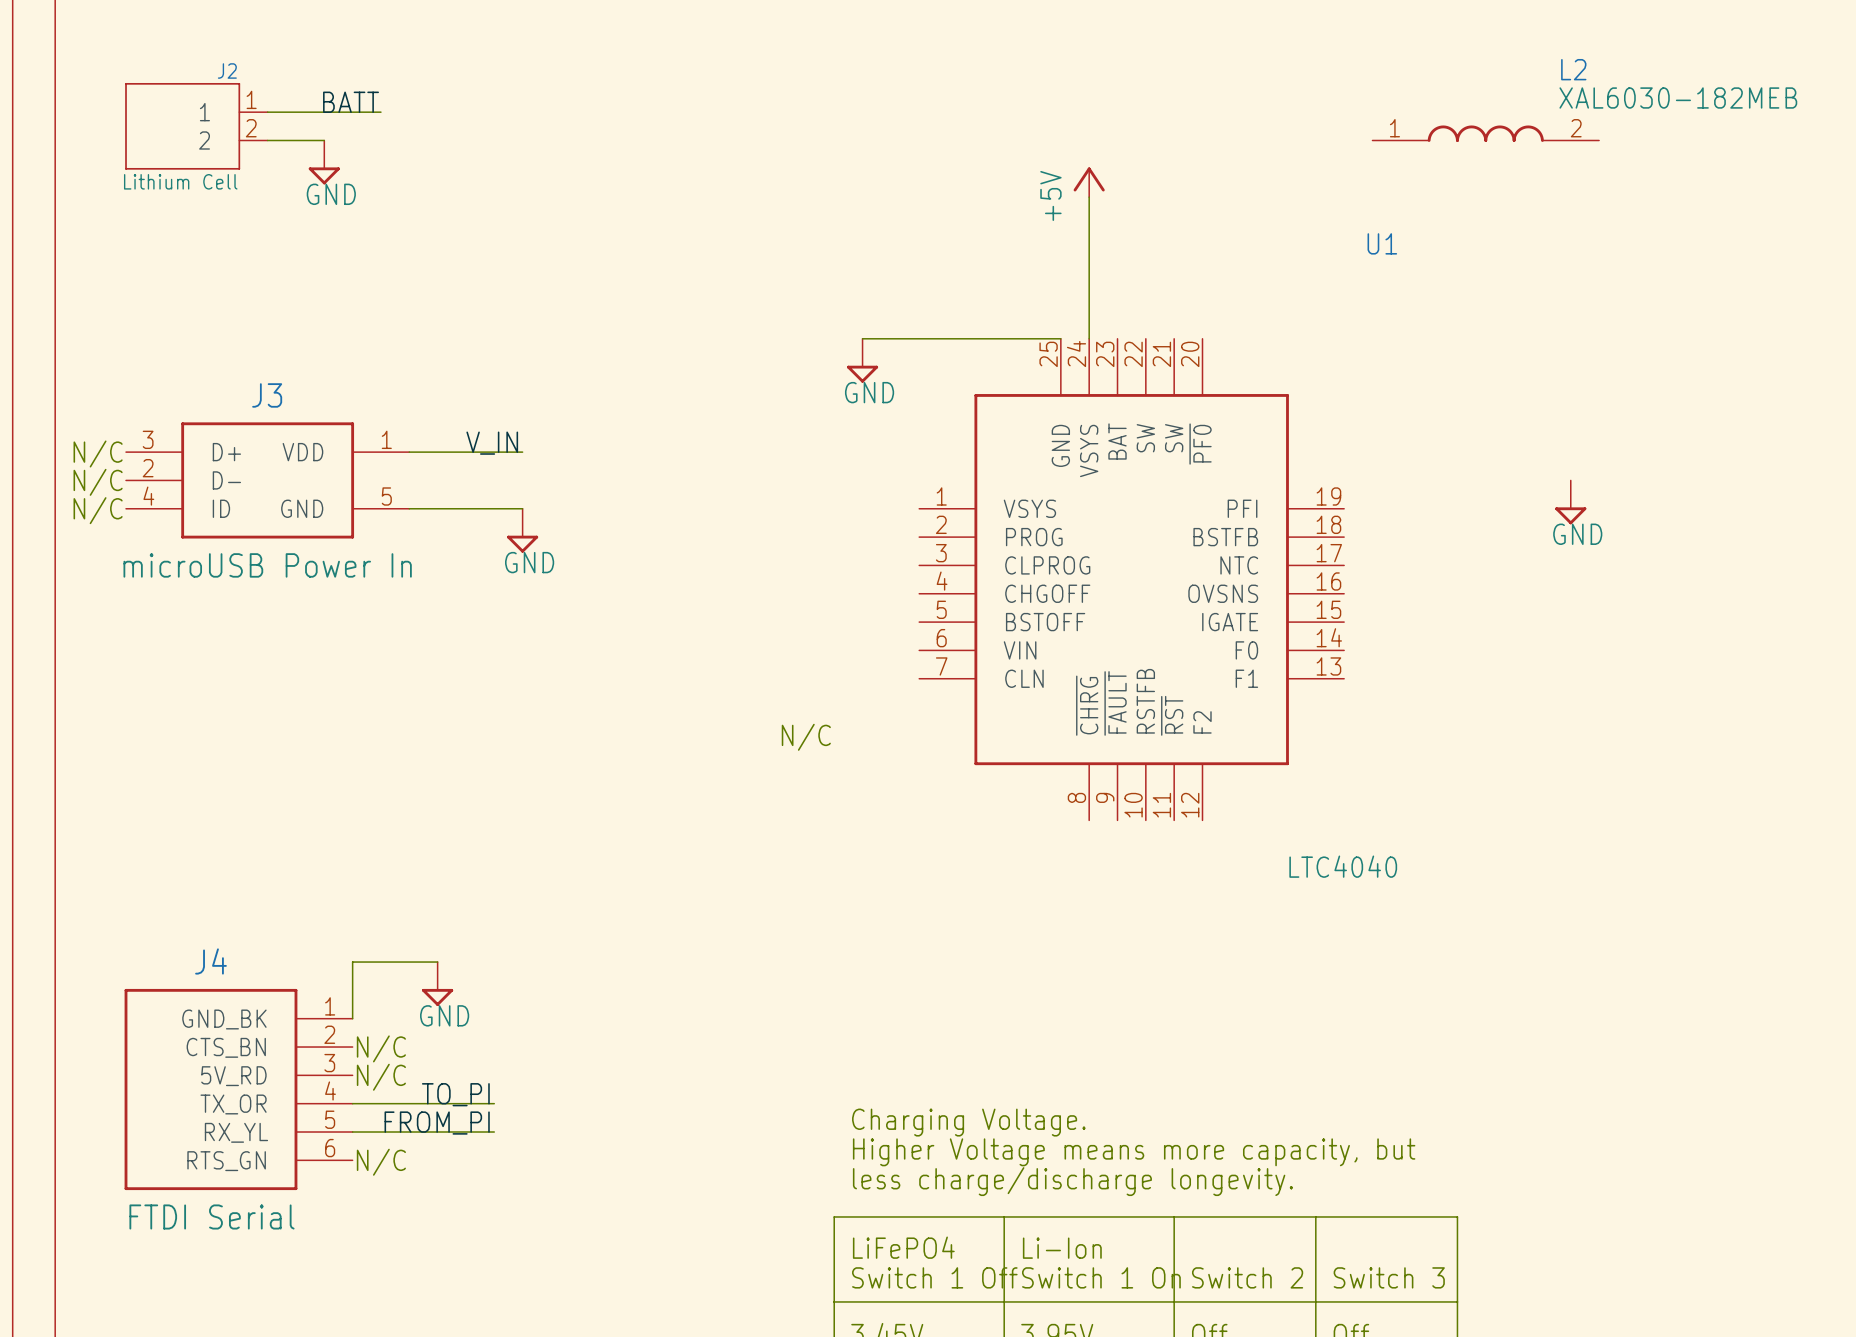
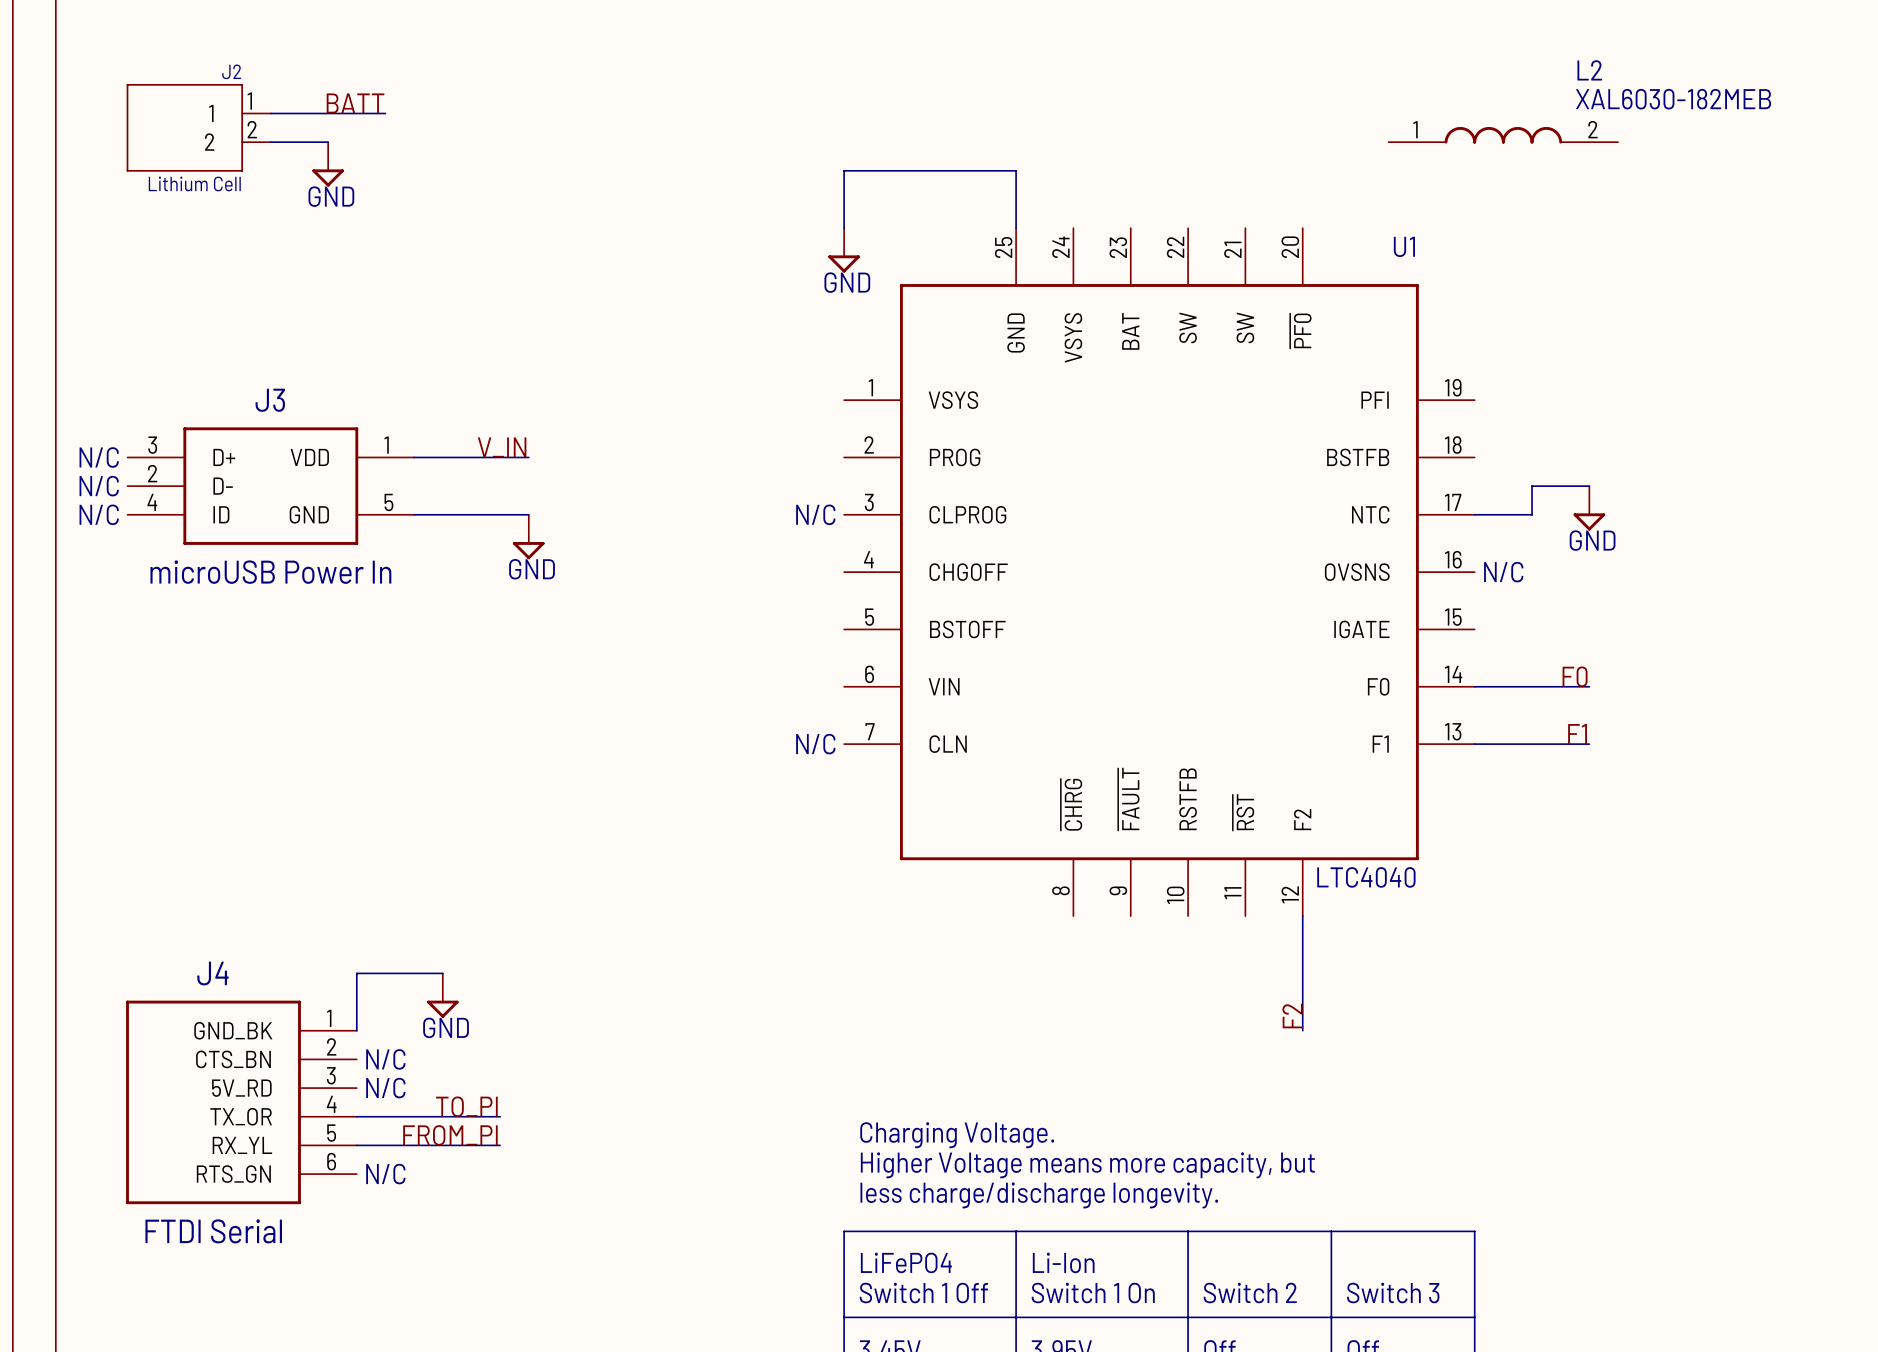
power symbol: +5V (1089, 182) -> none
wire: (1089, 197) (1089, 338) -> none
wire: none -> (844, 228) (844, 170) (1016, 170) (1016, 228)
wire: (862, 338) (1060, 338) -> none
U1 symbol: [919, 338, 1345, 821] -> [844, 228, 1475, 917]
power symbol position: GND (862, 360) -> GND (844, 250)
wire: none -> (1589, 486) (1532, 486) (1532, 514) (1474, 514)
text: none -> N/C (815, 514)
text: none -> N/C (1503, 572)
label: none -> F0 (1575, 676)
wire: none -> (1474, 686) (1589, 686)
label: none -> F1 (1577, 734)
wire: none -> (1474, 744) (1589, 744)
wire: none -> (1302, 916) (1302, 1030)
label: none -> F2 (1292, 1016)

